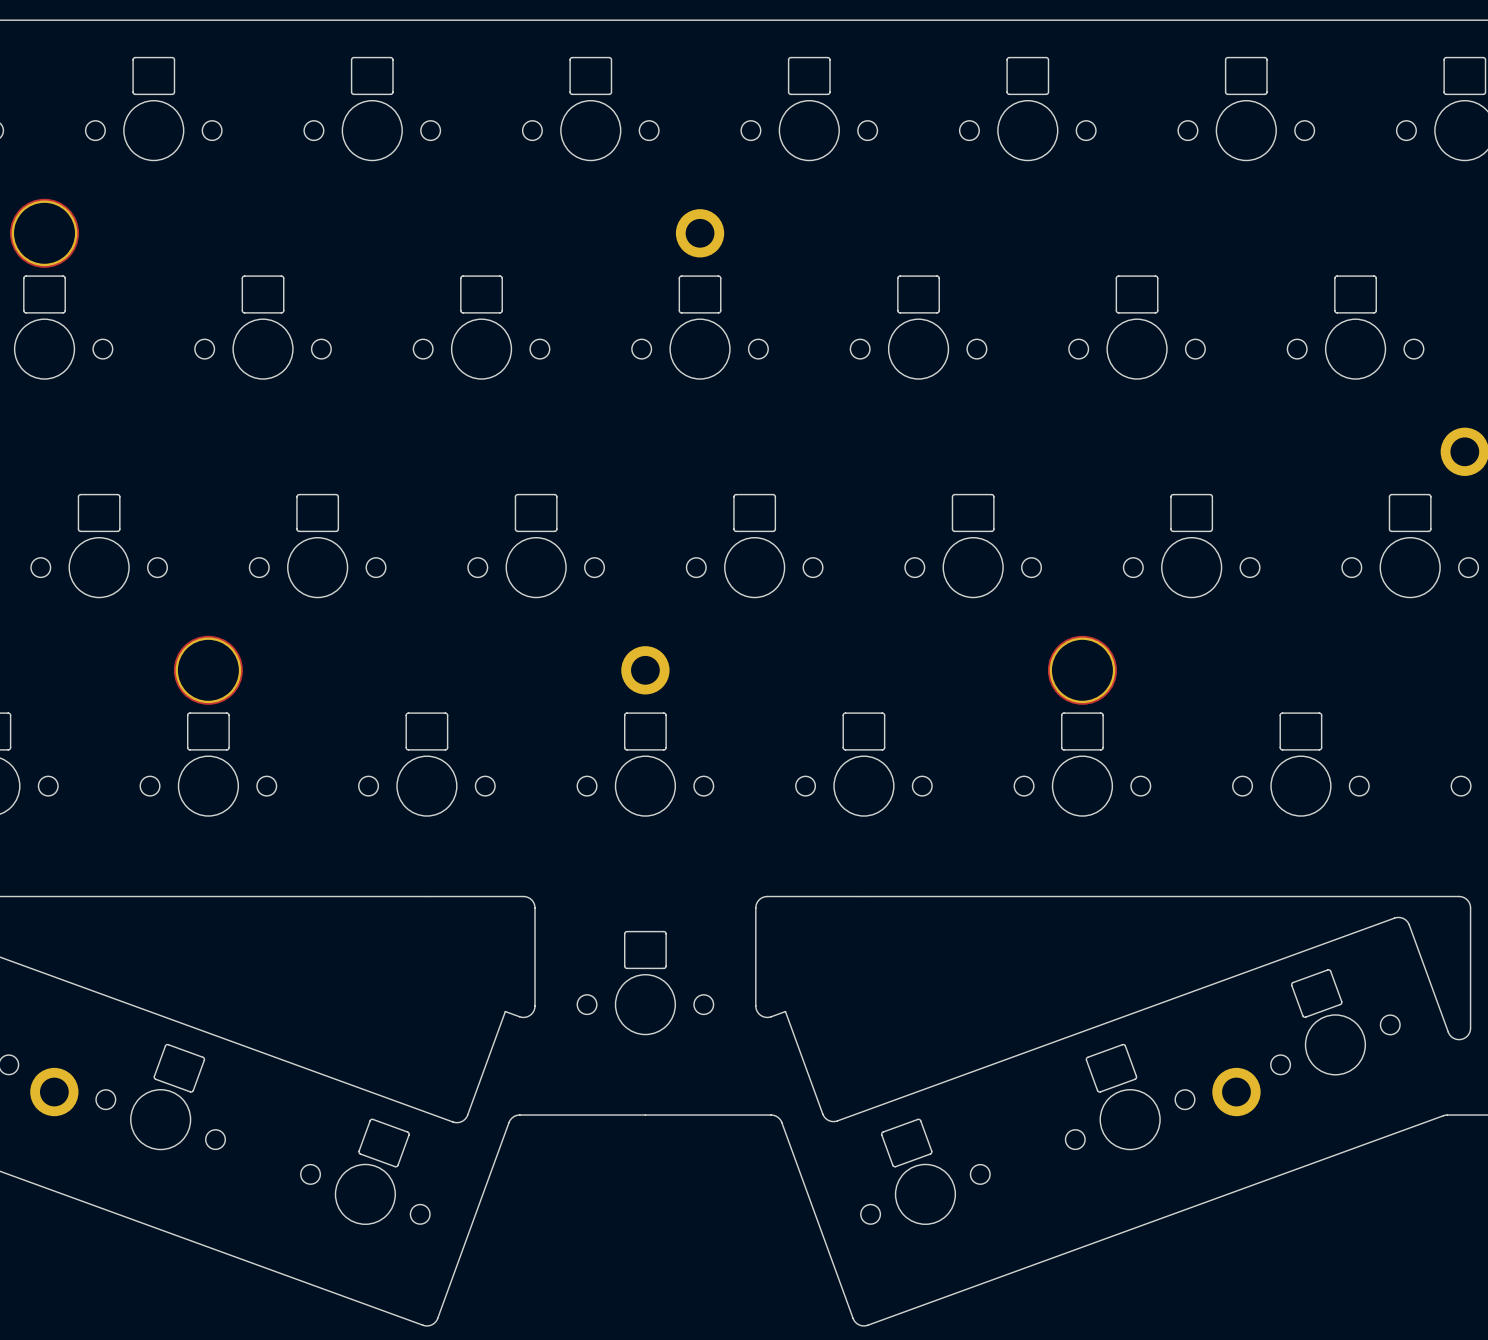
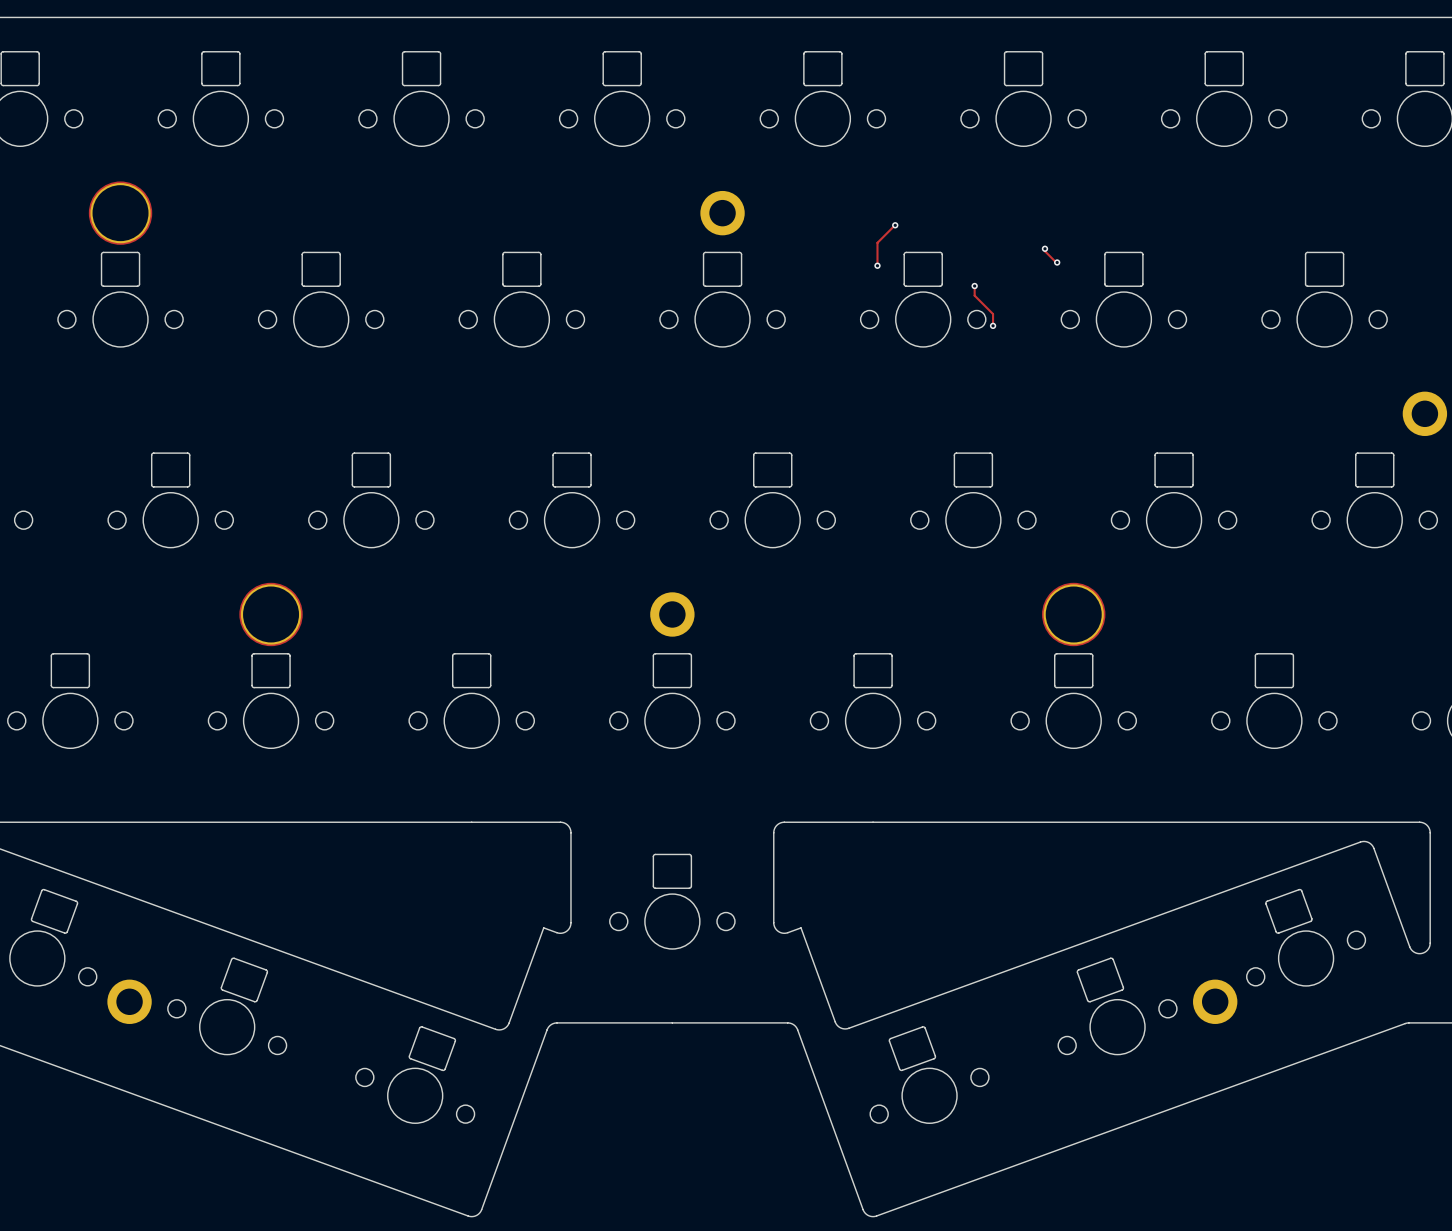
track: none -> (895, 225) (877, 242) (877, 265)
via: none -> (895, 225)
track: none -> (1044, 248) (1044, 251) (1057, 262)
via: none -> (1044, 248)
via: none -> (1057, 262)
via: none -> (877, 265)
track: none -> (974, 286) (974, 295) (993, 314) (993, 325)
via: none -> (974, 286)
via: none -> (993, 325)

